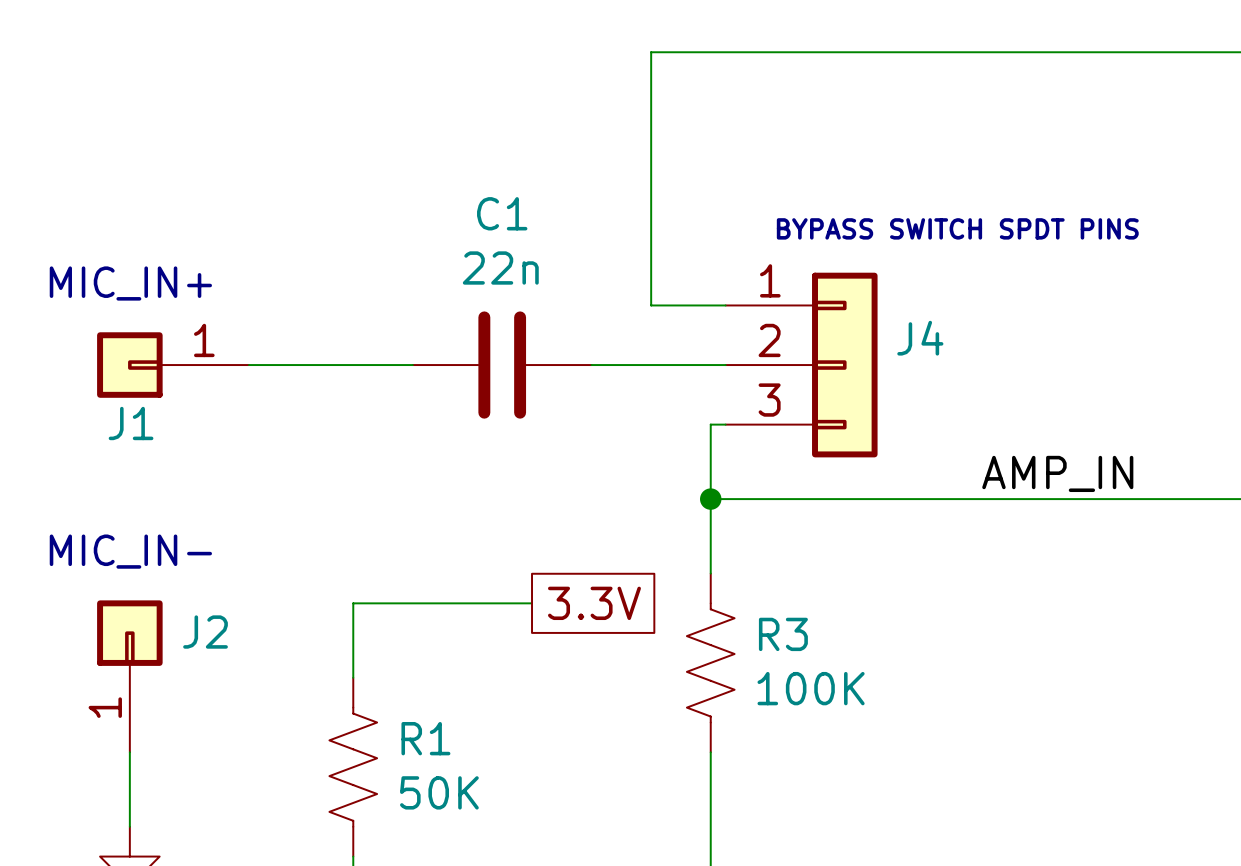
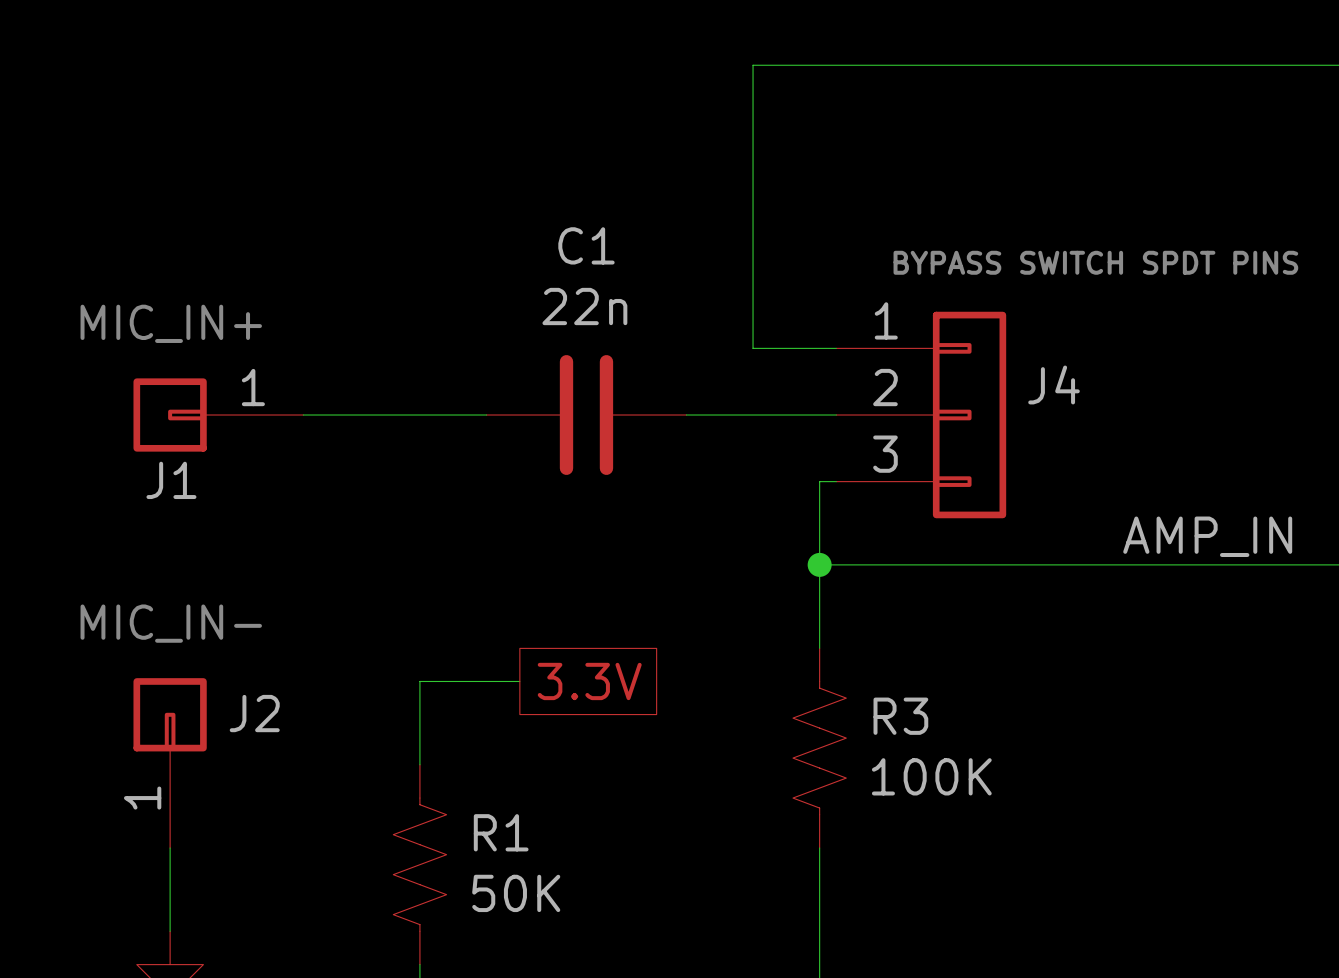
wire: (442, 603) (532, 603) -> none
global label position: 3.3V (594, 603) -> 3.3V (589, 681)

